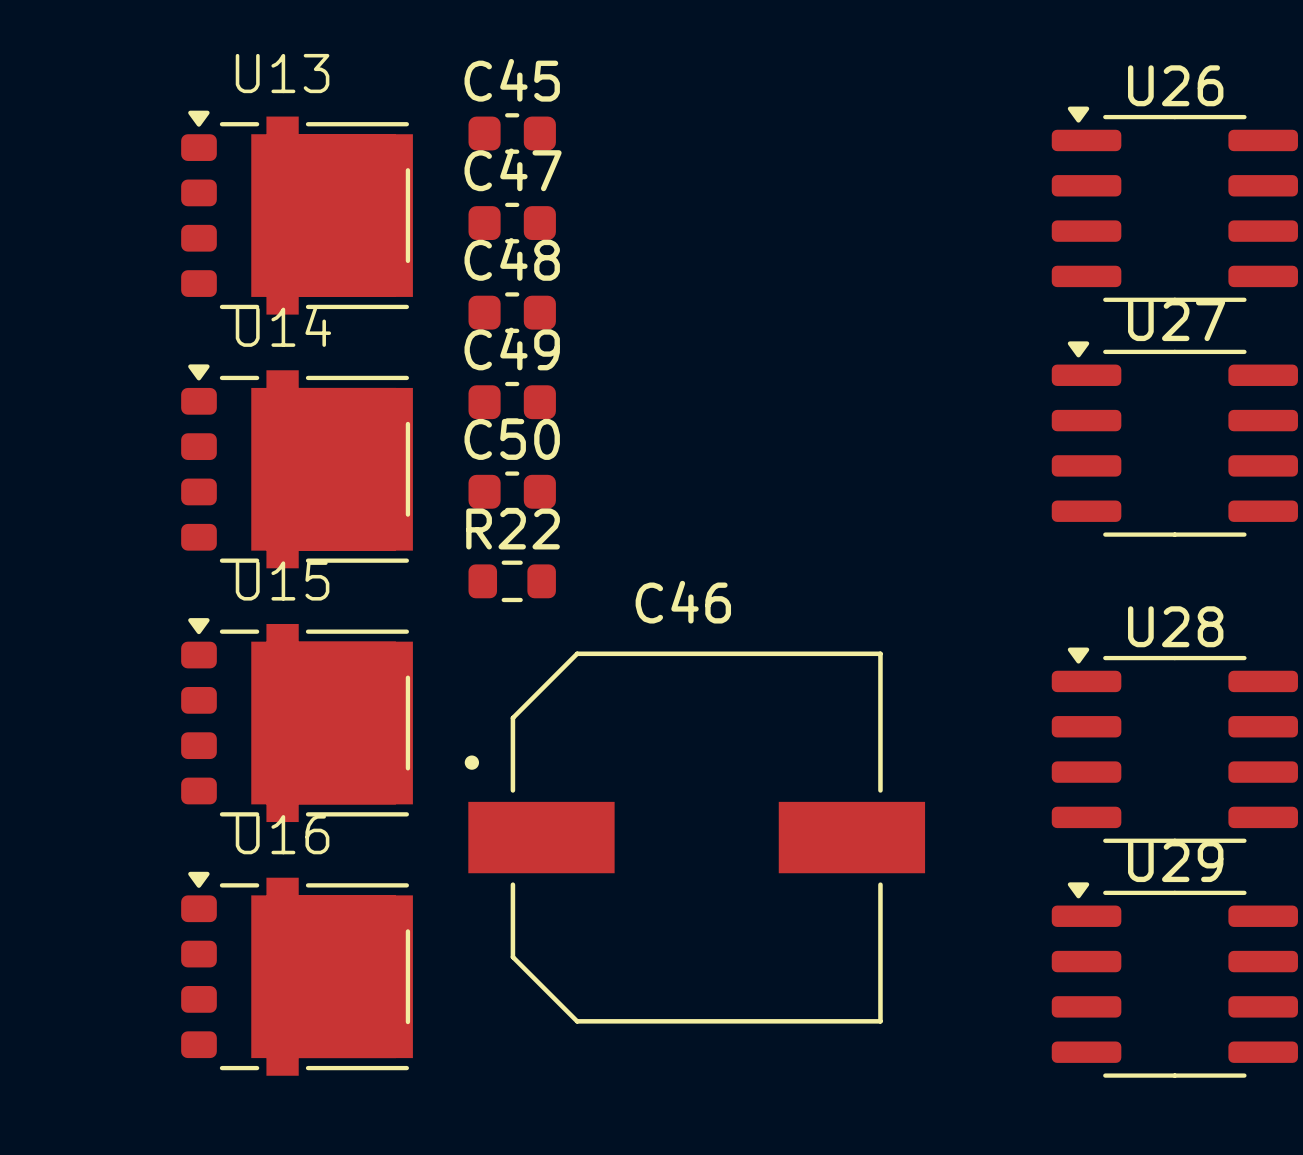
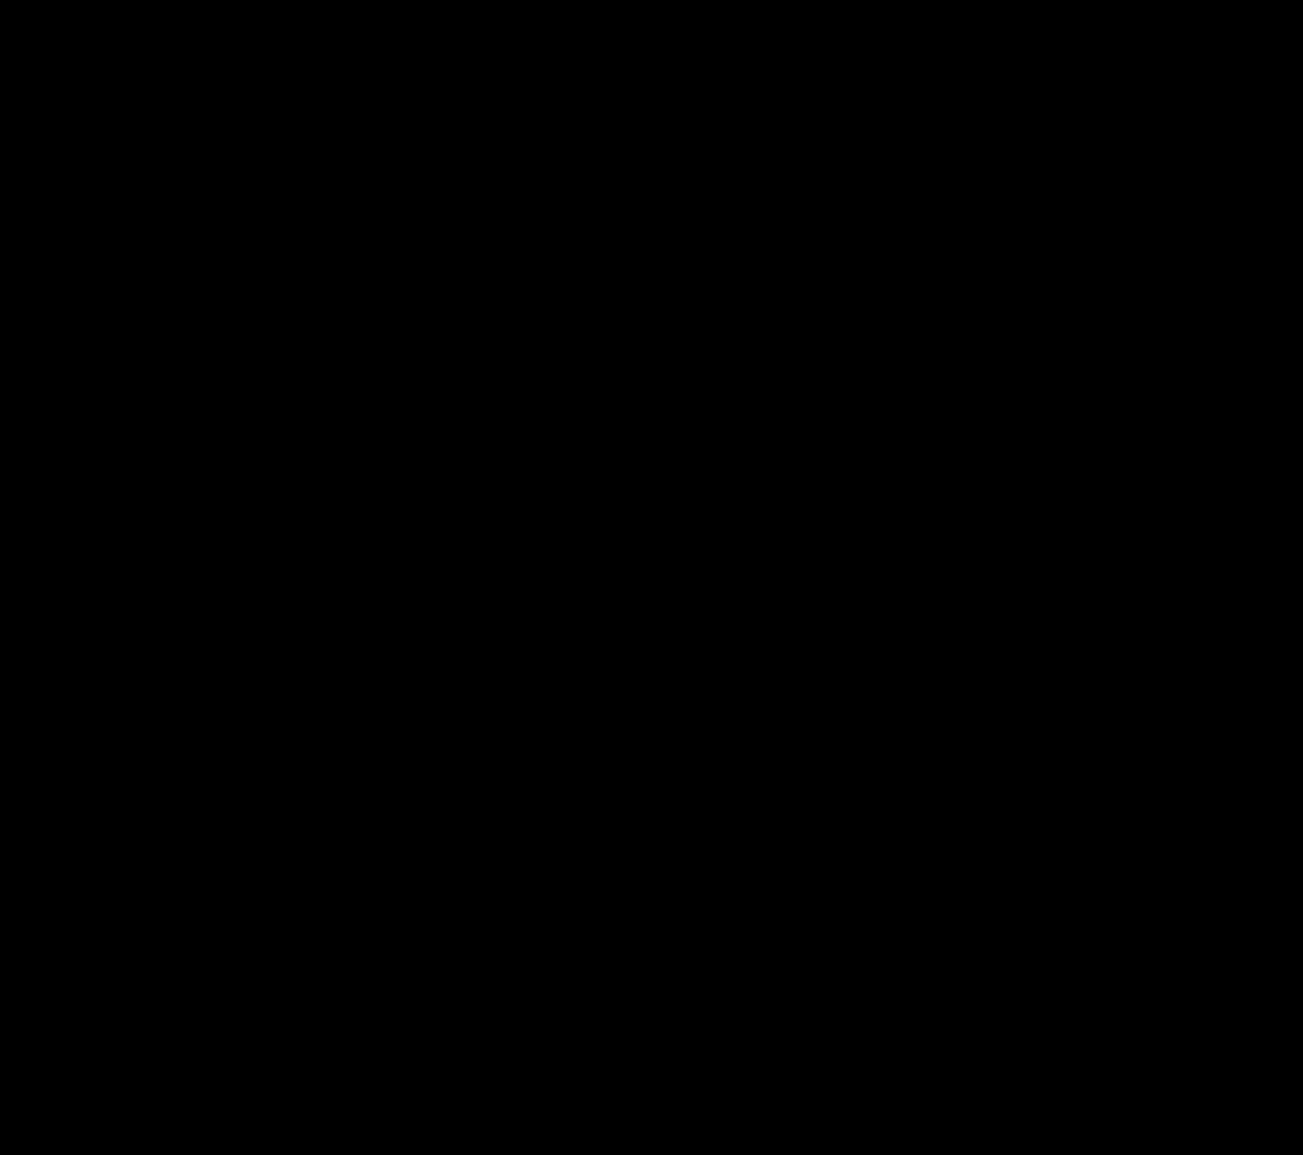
C45: (512, 133) -> none
U26: (1174, 204) -> none
U13: (297, 212) -> none
C47: (512, 223) -> none
C48: (512, 312) -> none
C49: (512, 402) -> none
U27: (1174, 439) -> none
U14: (297, 466) -> none
C50: (512, 491) -> none
R22: (512, 581) -> none
U15: (297, 720) -> none
U28: (1174, 745) -> none
C46: (694, 837) -> none
U16: (297, 973) -> none
U29: (1174, 980) -> none

